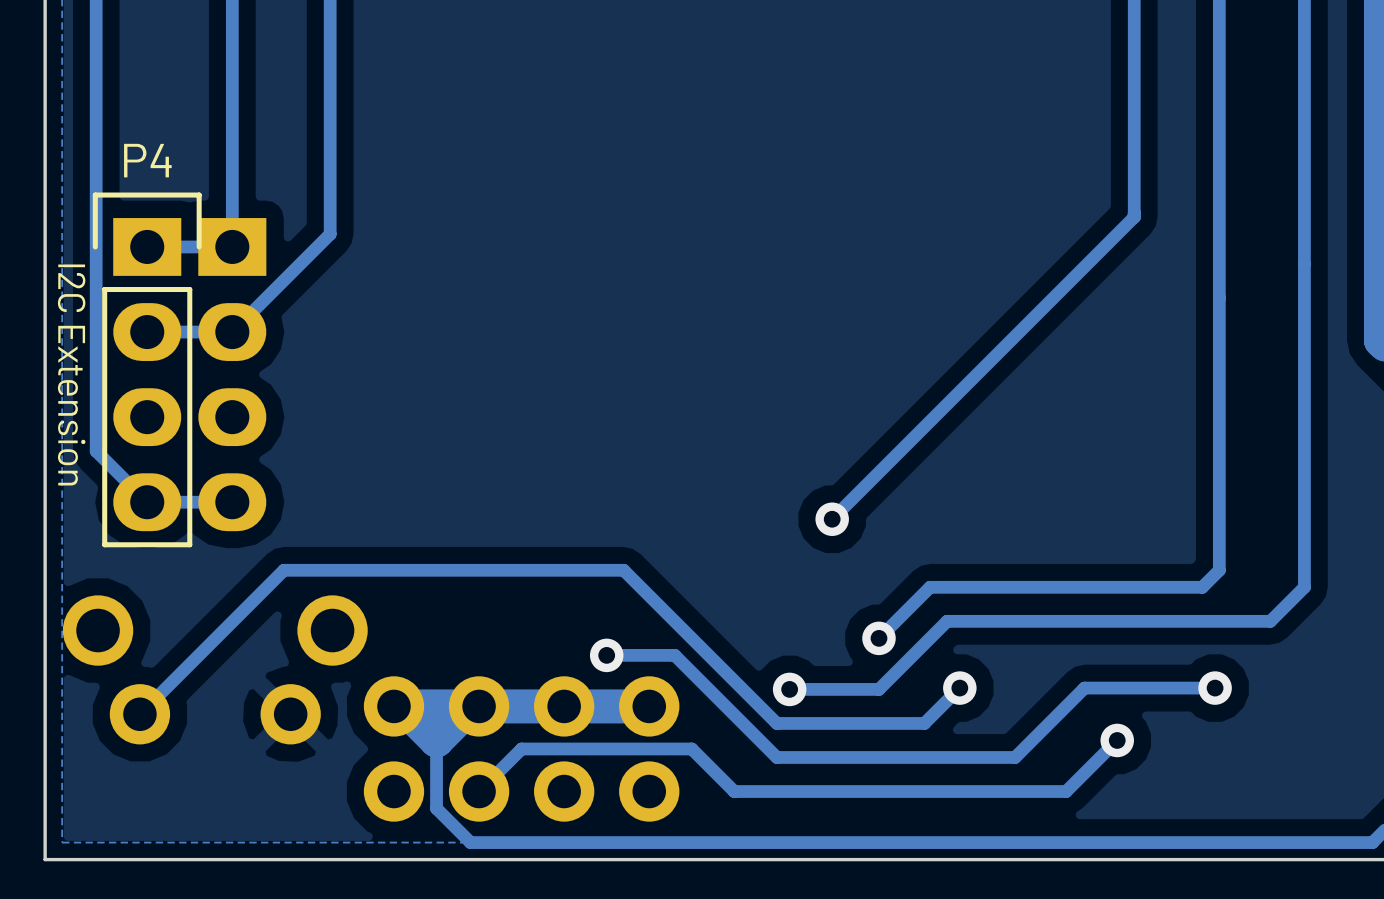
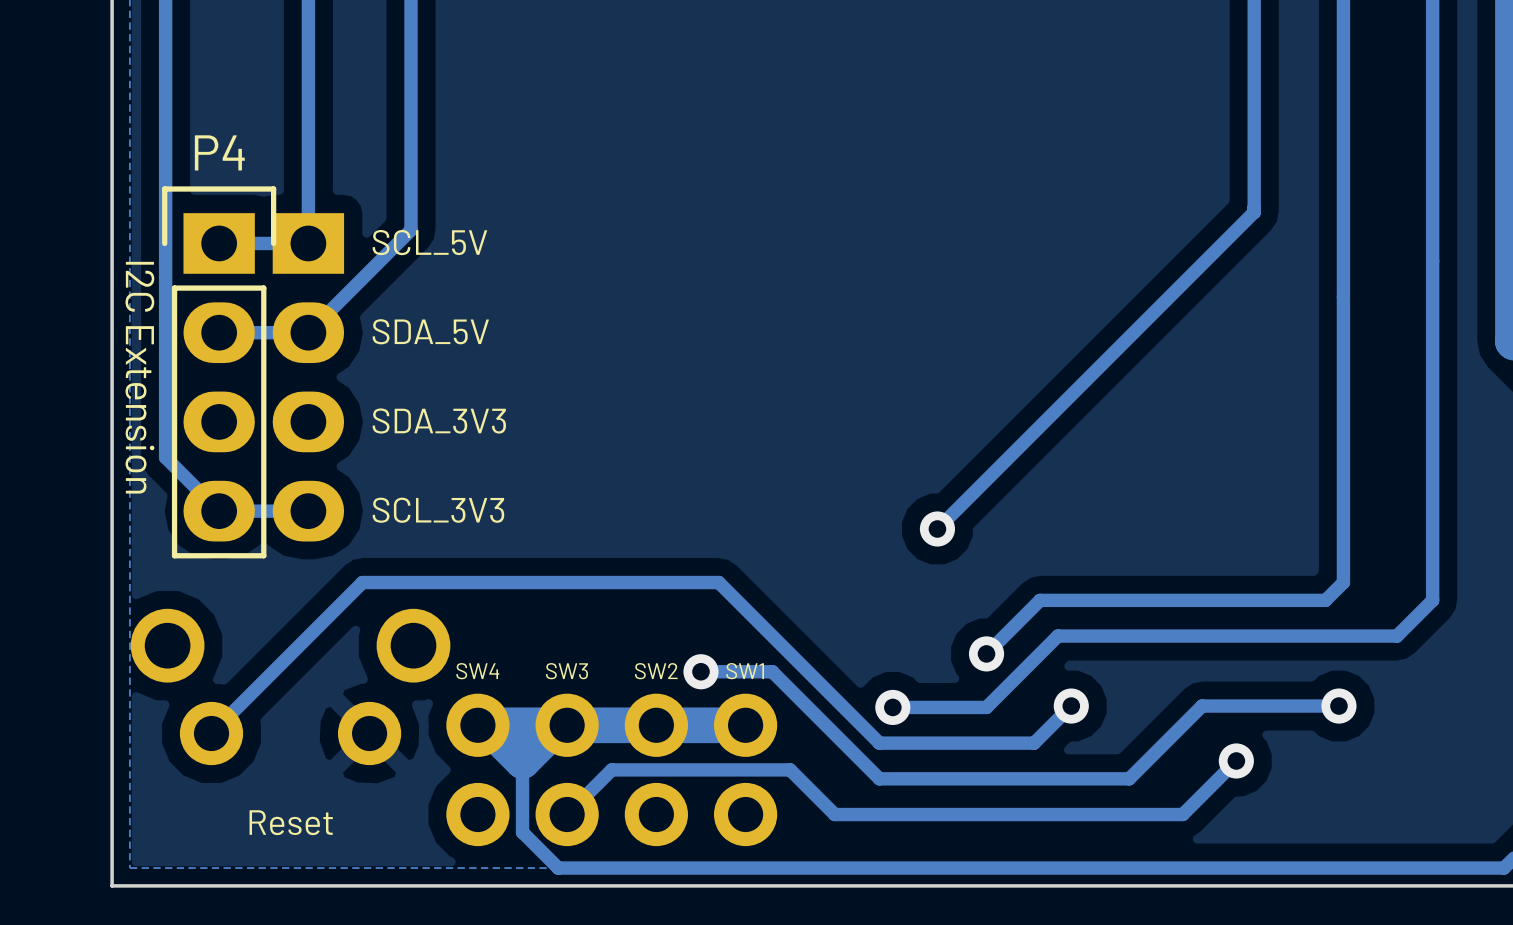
text: none -> SCL_5V (429, 242)
text: none -> SDA_5V (430, 331)
text: none -> SDA_3V3 (439, 421)
text: none -> SCL_3V3 (438, 510)
text: none -> SW4 (477, 671)
text: none -> SW3 (567, 671)
text: none -> SW2 (656, 671)
text: none -> SW1 (745, 671)
text: none -> Reset (291, 822)

